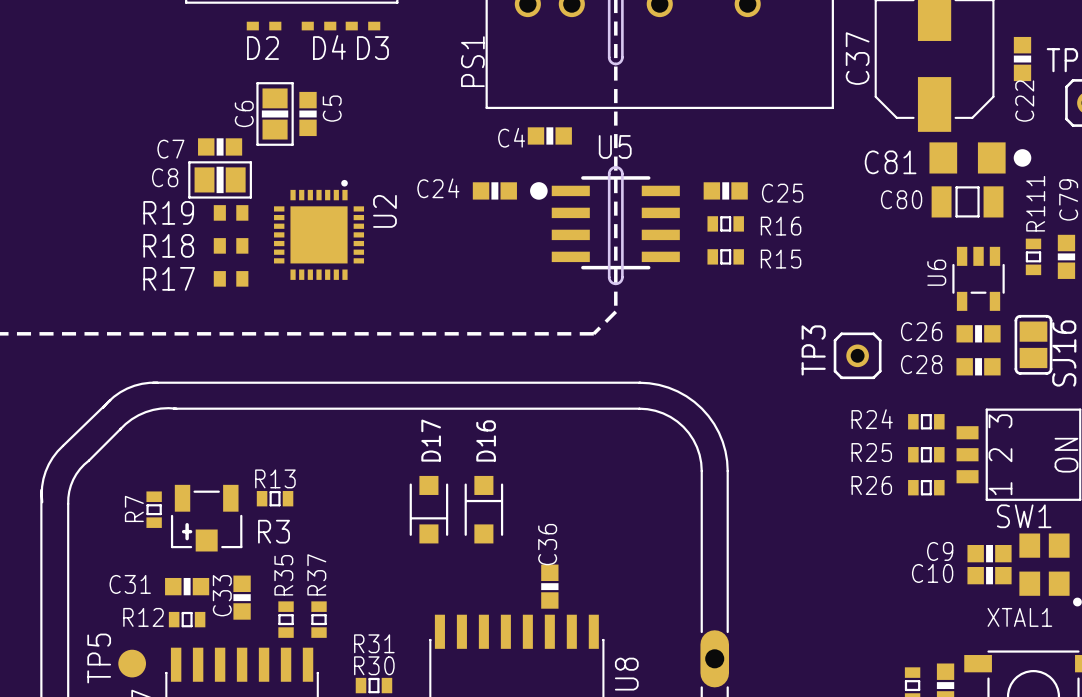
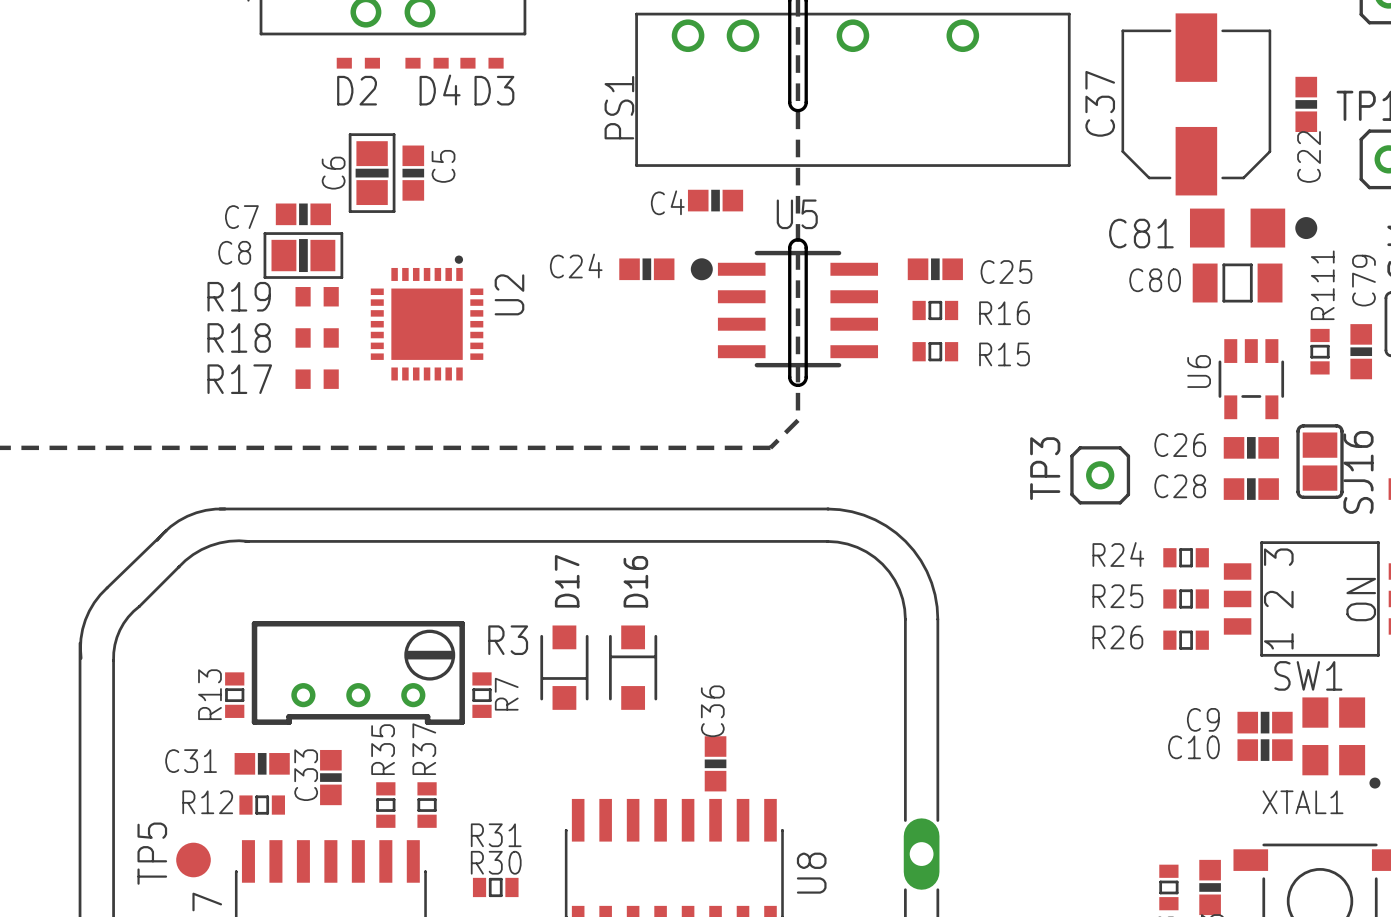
R3 footprint: [170, 484, 243, 552] -> [251, 621, 465, 725]
R13 rotation: 0° (275, 498) -> 90° clockwise (234, 695)
R13 position: (275, 498) -> (234, 695)
R7 name position: R7 (134, 508) -> R7 (506, 694)
R7 position: (154, 509) -> (482, 695)
R3 name position: R3 (274, 531) -> R3 (508, 640)

